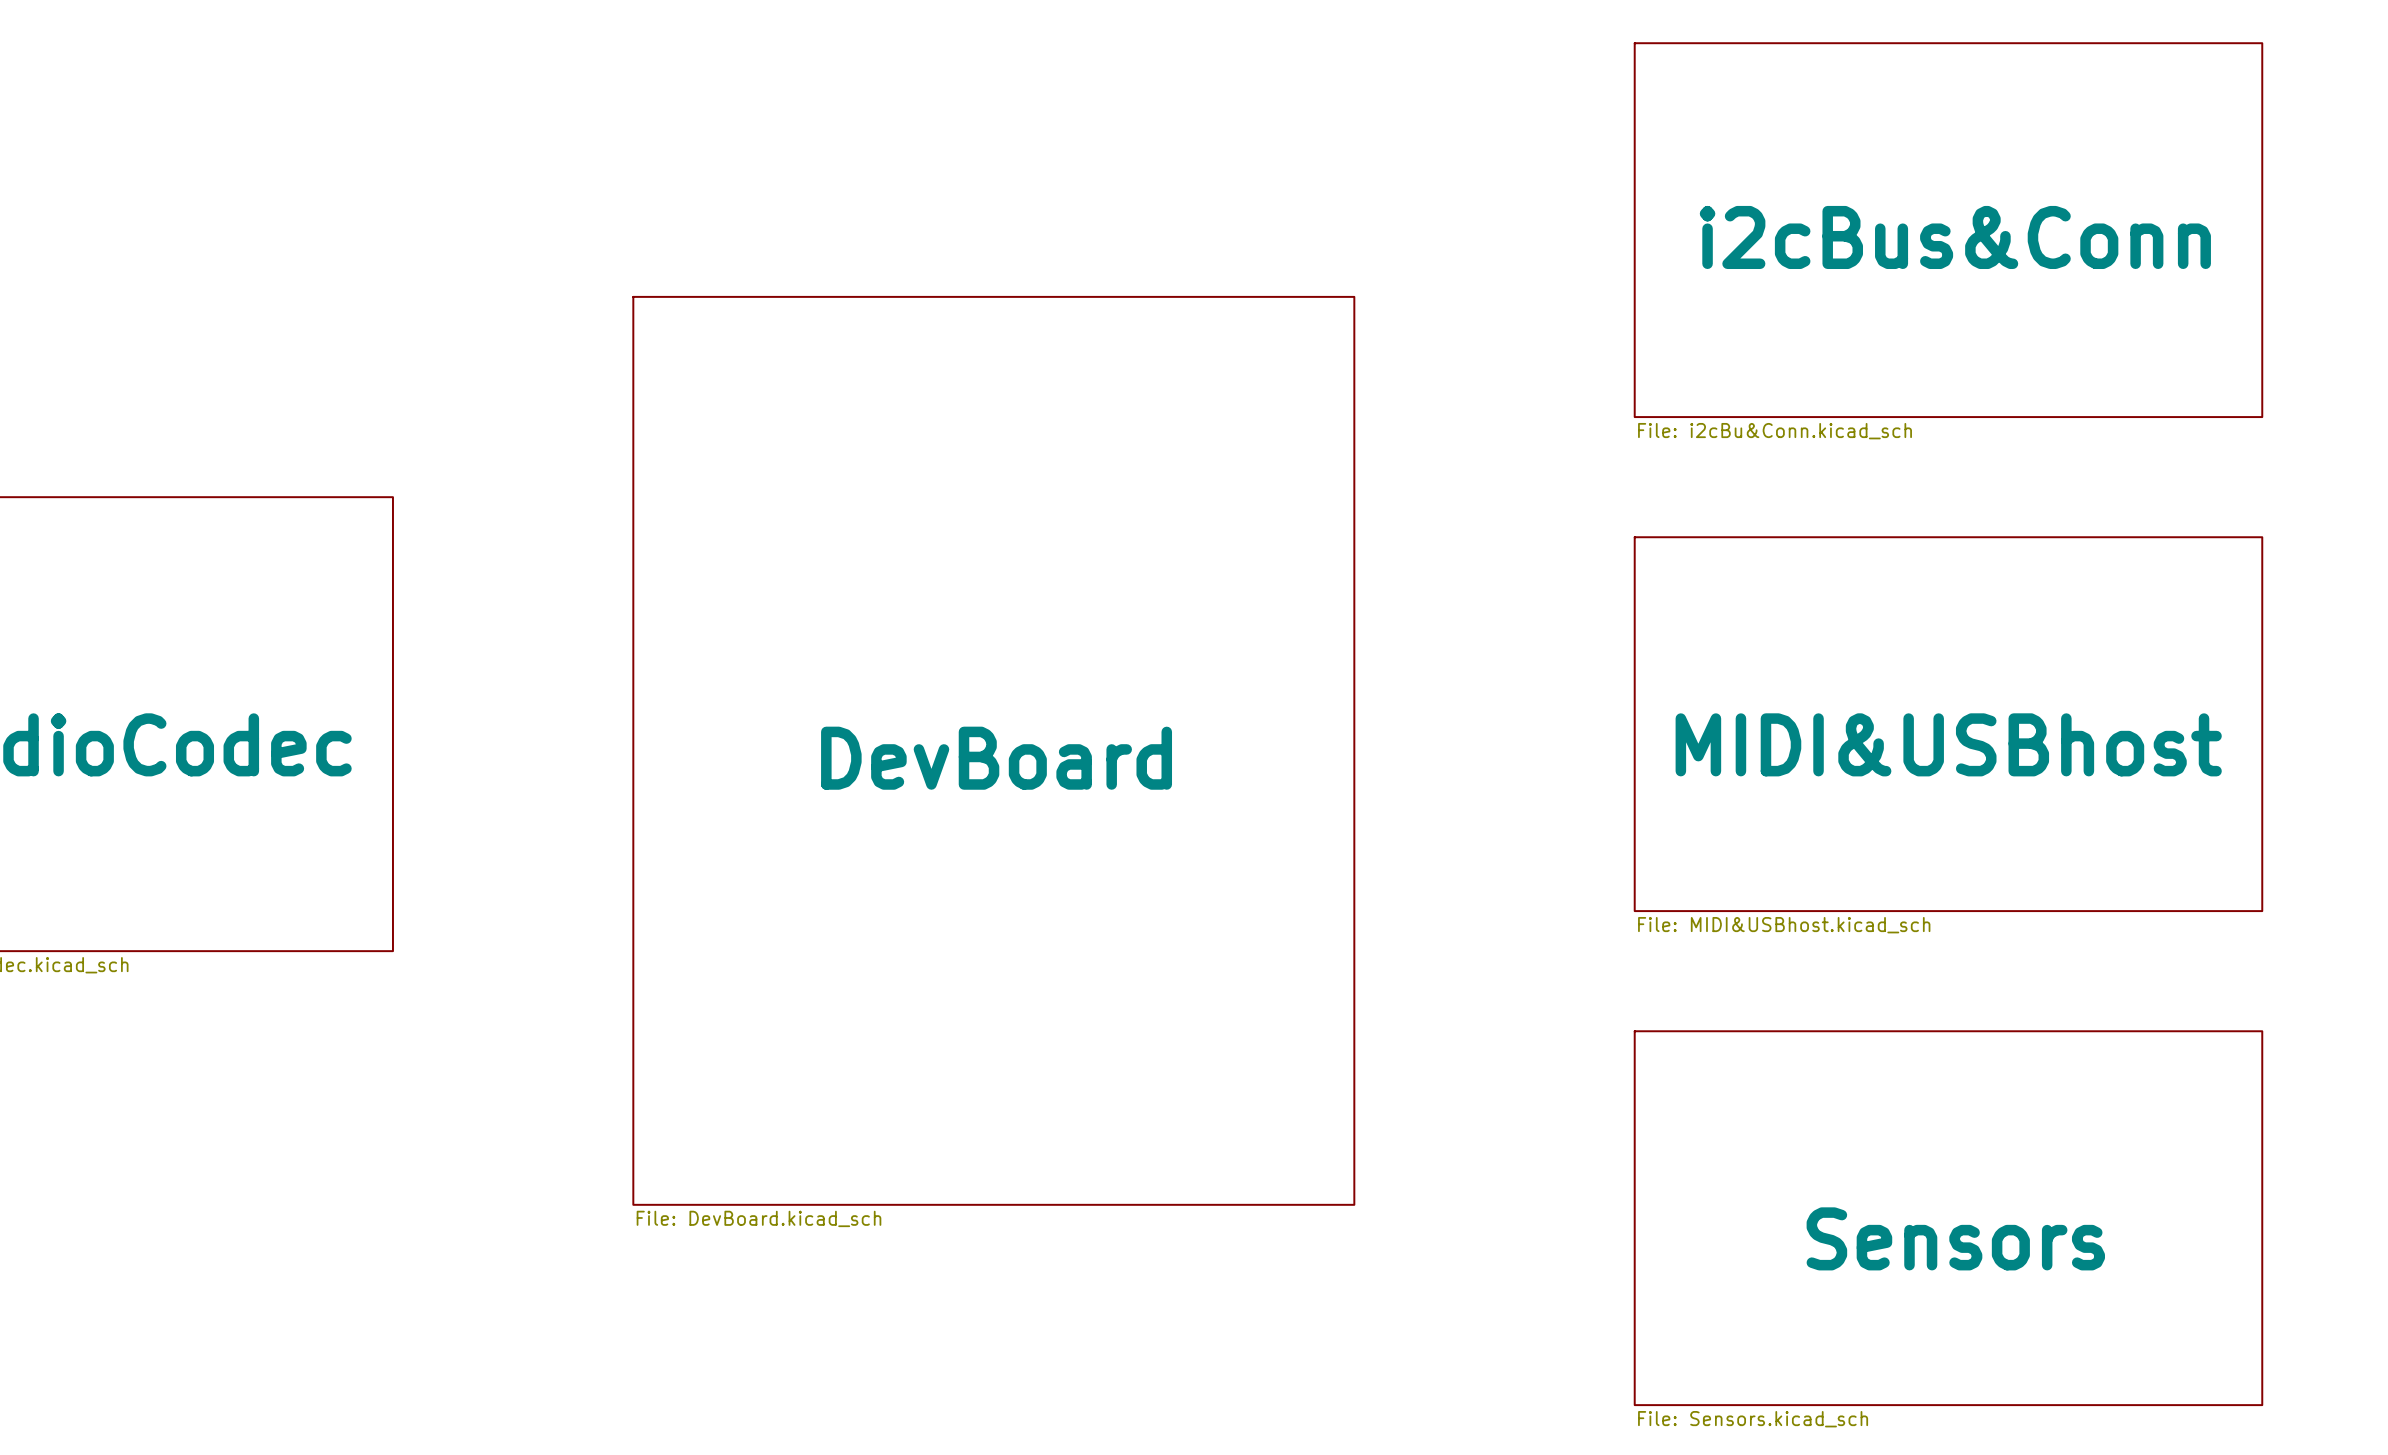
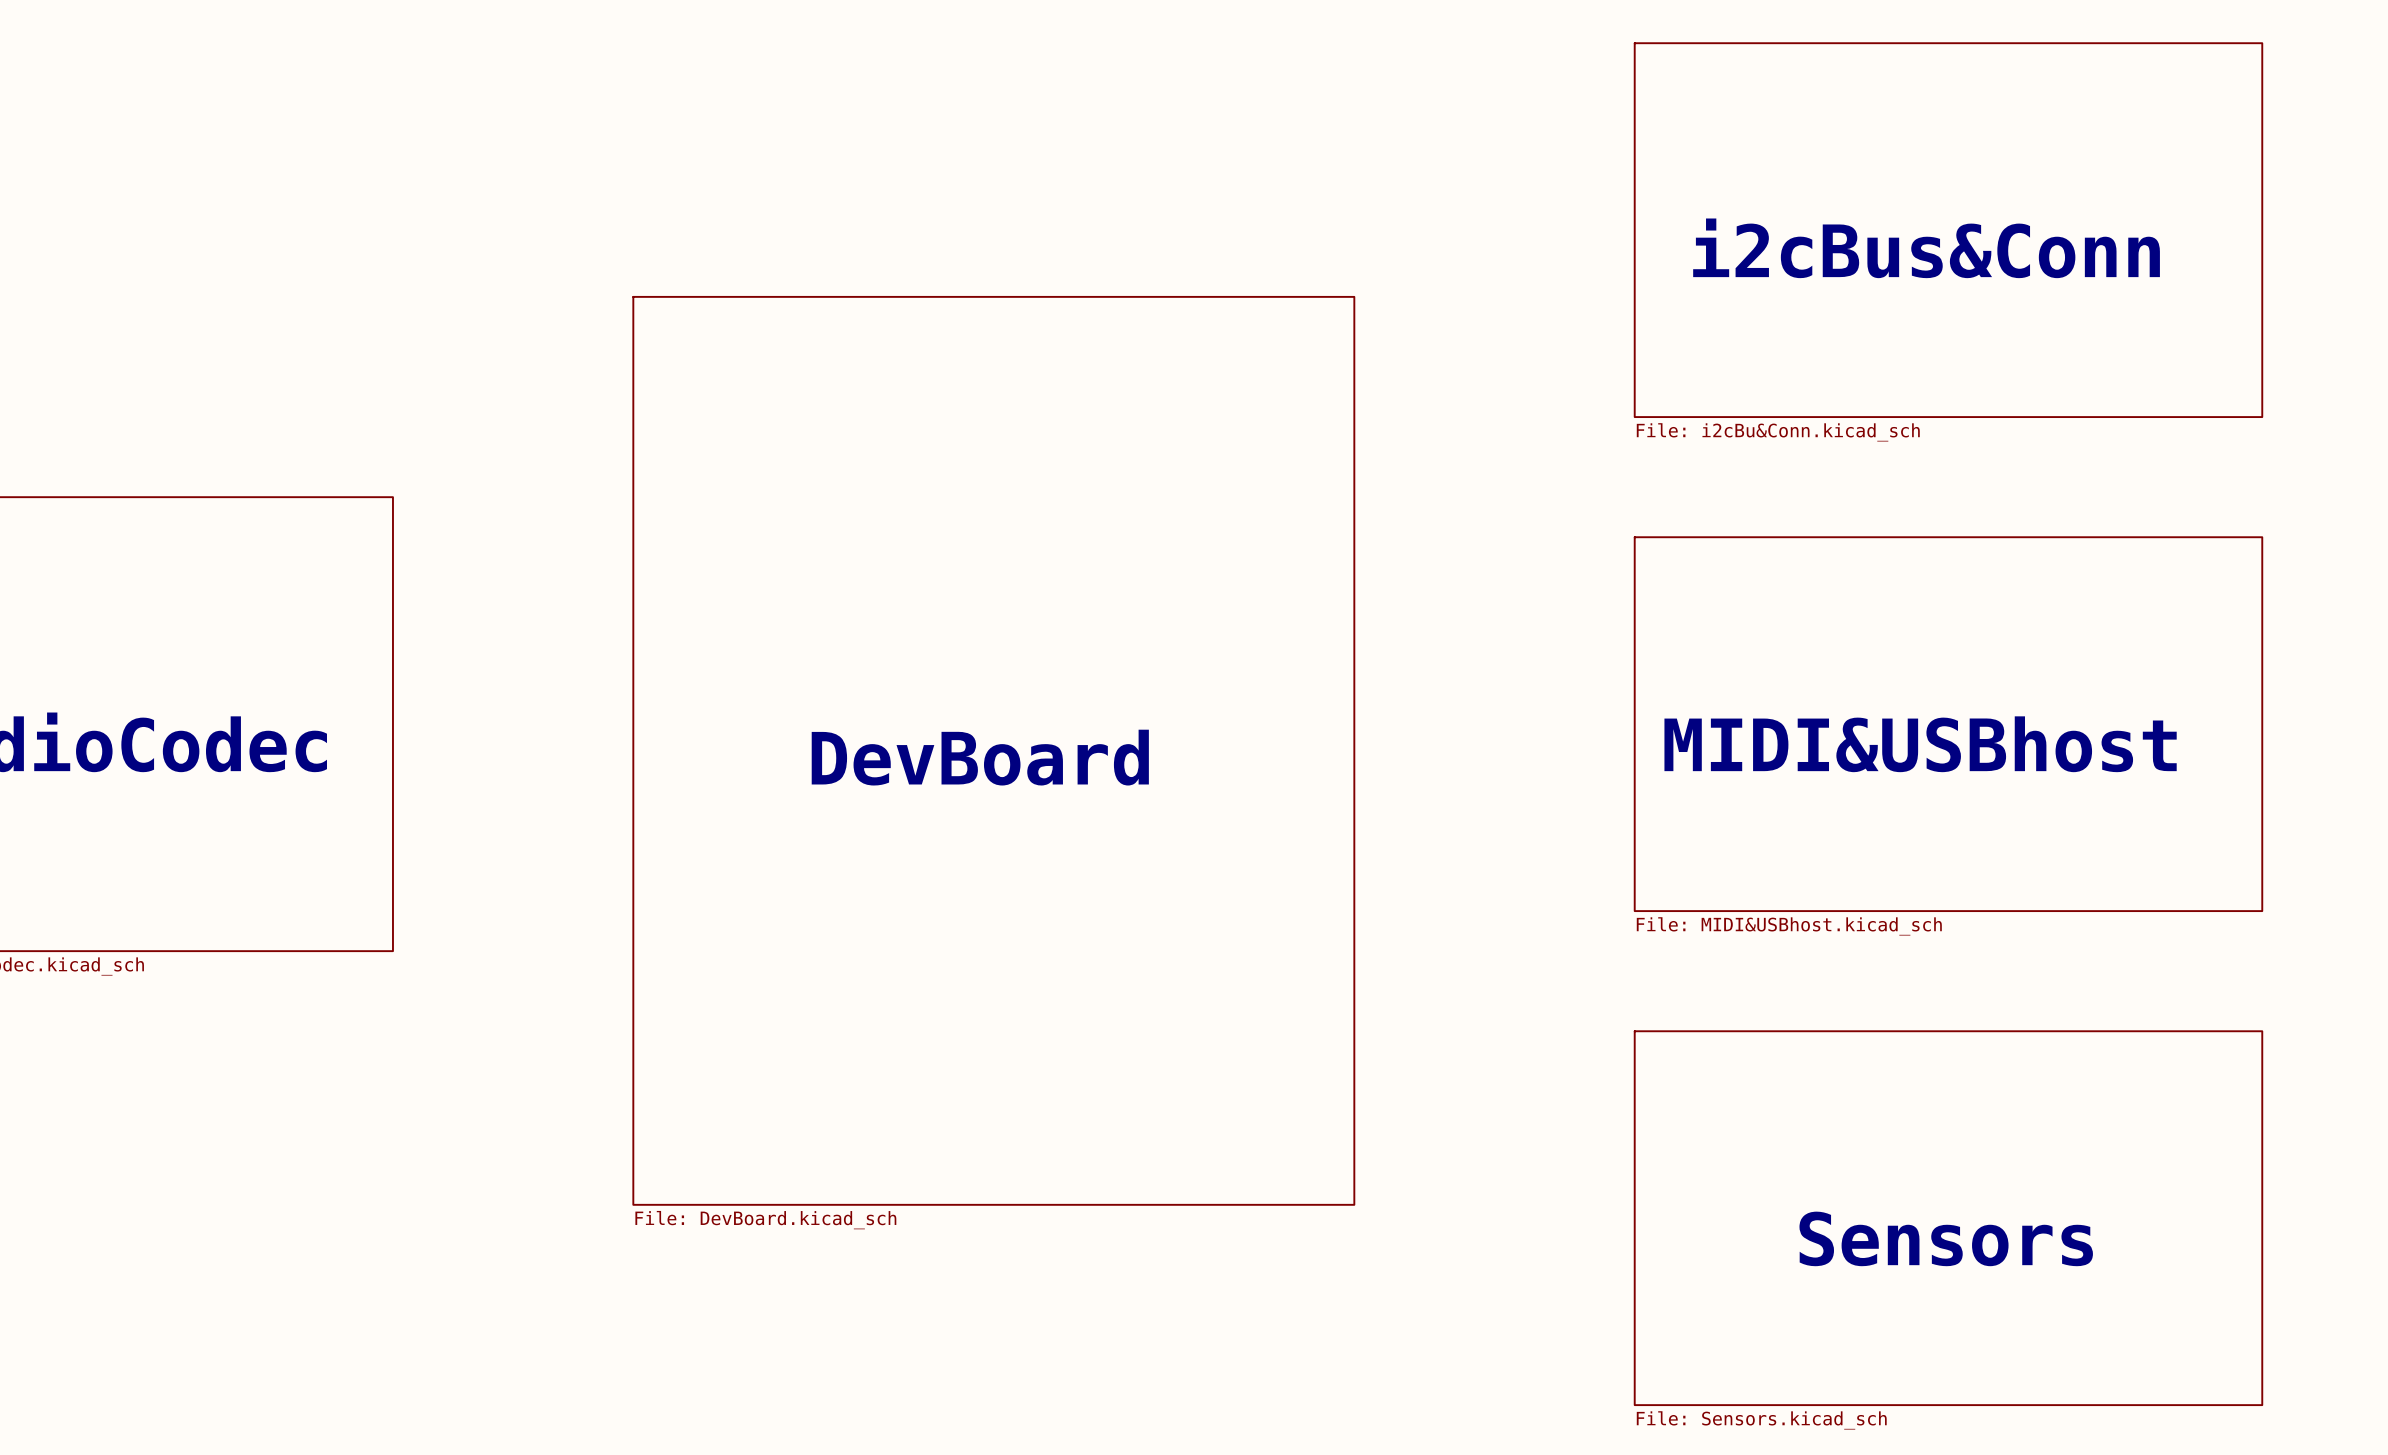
sheet i2cBus&Conn name position: i2cBus&Conn (1955, 237) -> i2cBus&Conn (1926, 248)

